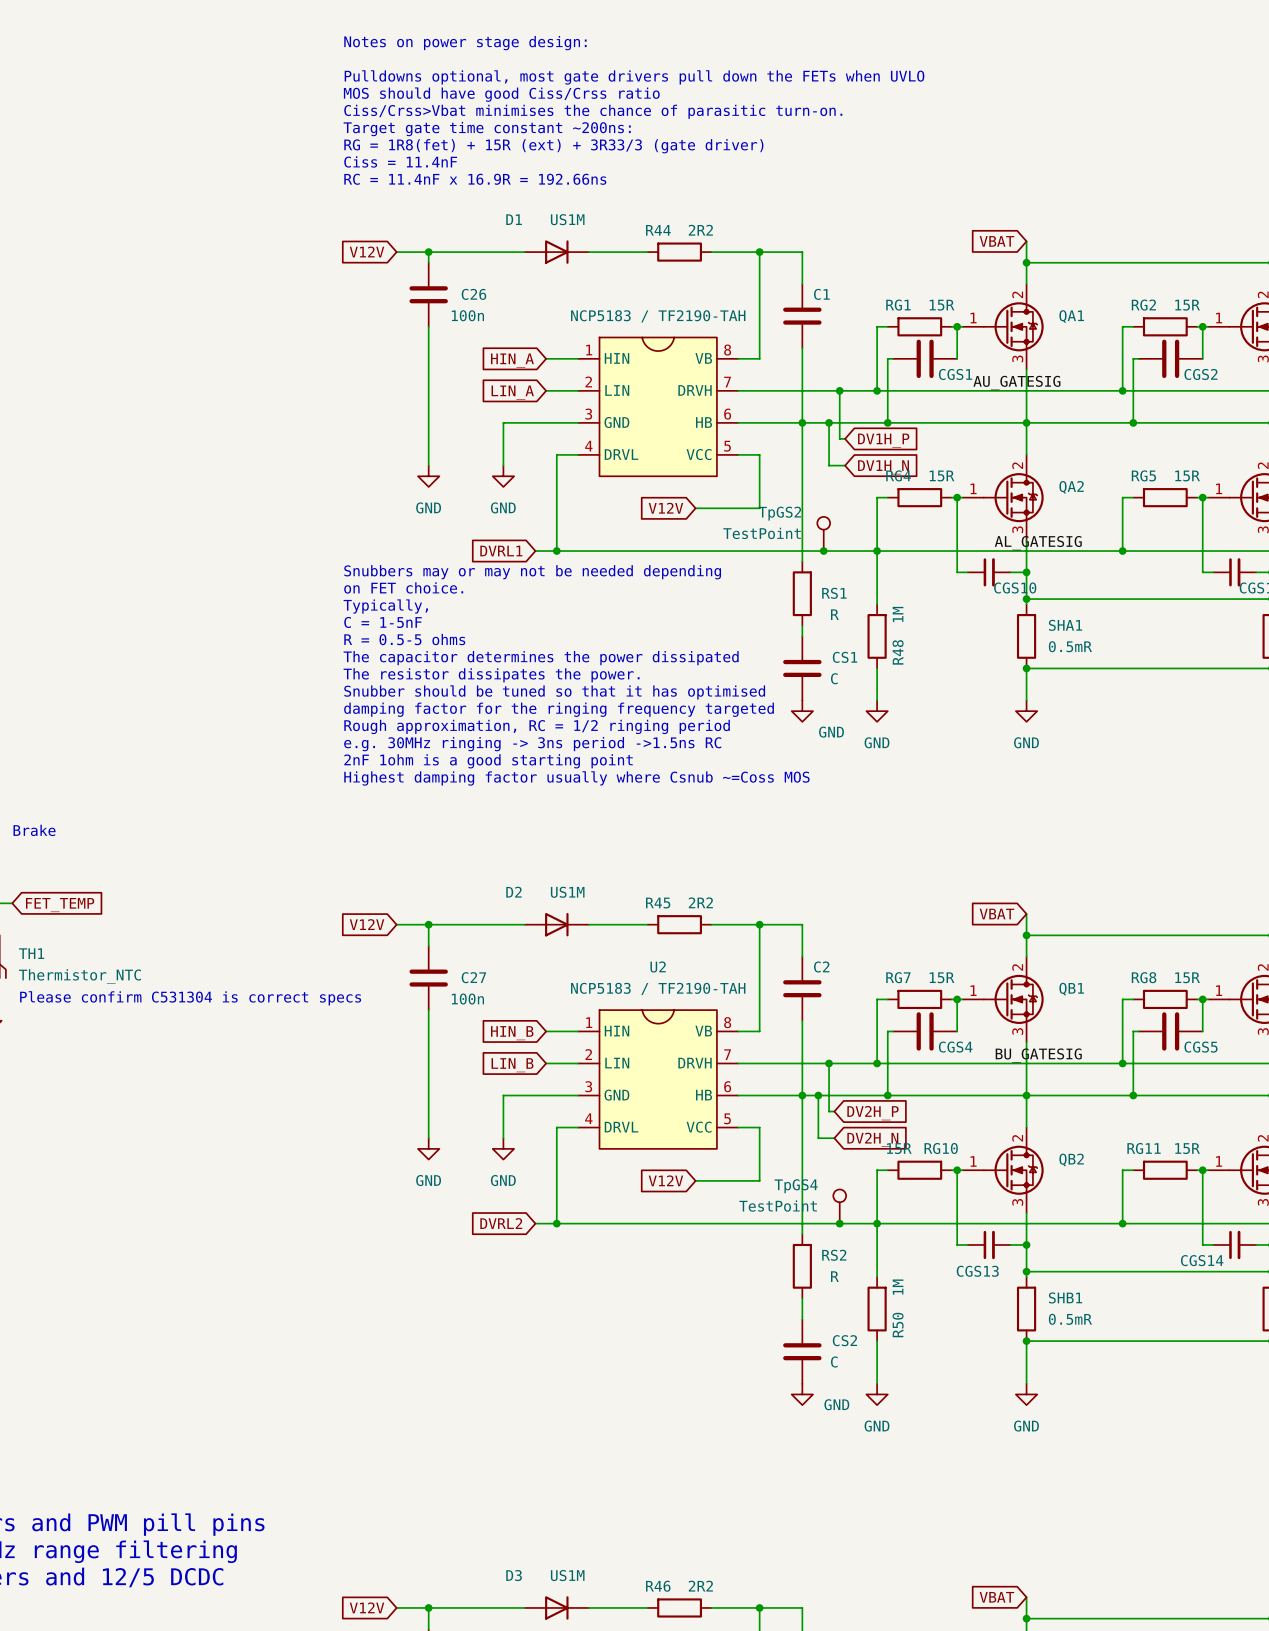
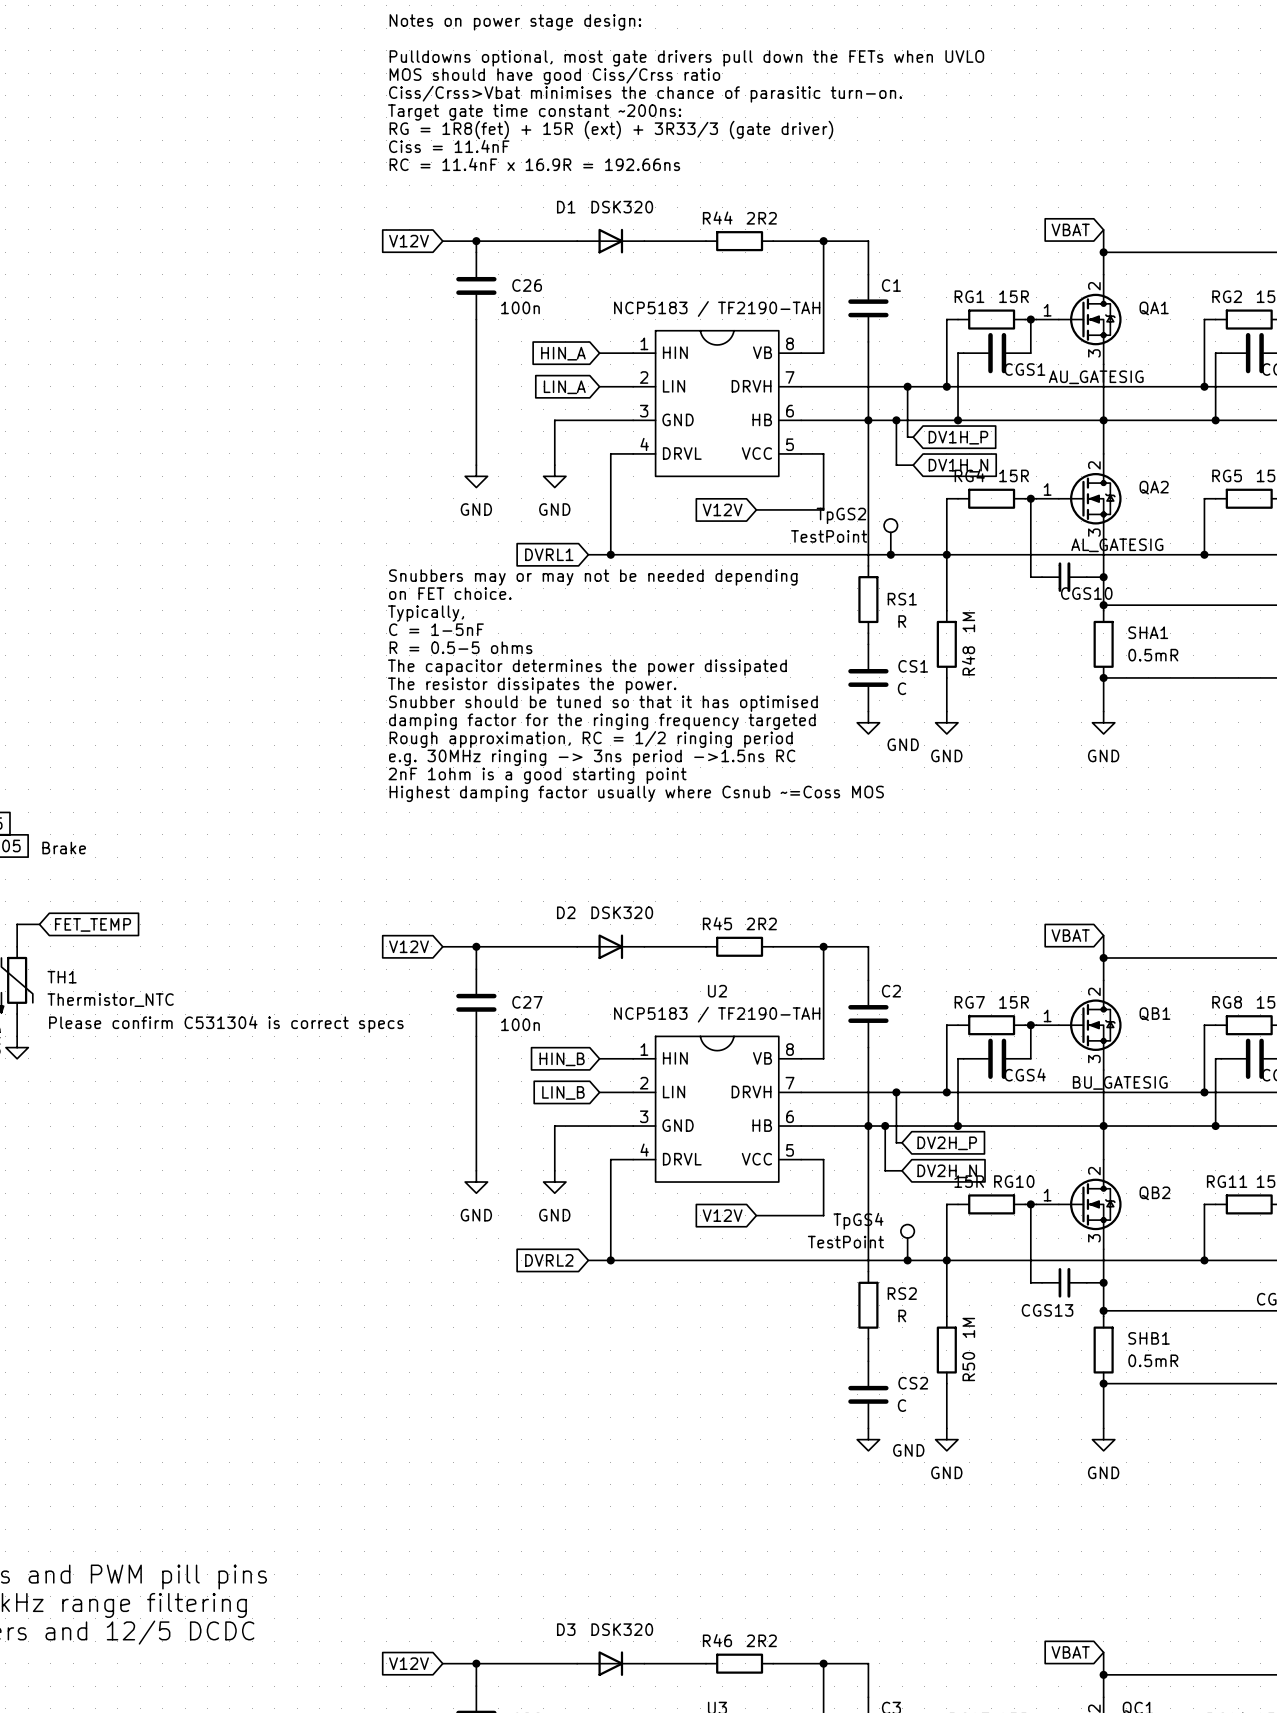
D1 value: US1M (567, 219) -> DSK320 (622, 207)
D2 value: US1M (567, 892) -> DSK320 (622, 912)
D3 value: US1M (567, 1575) -> DSK320 (622, 1629)

